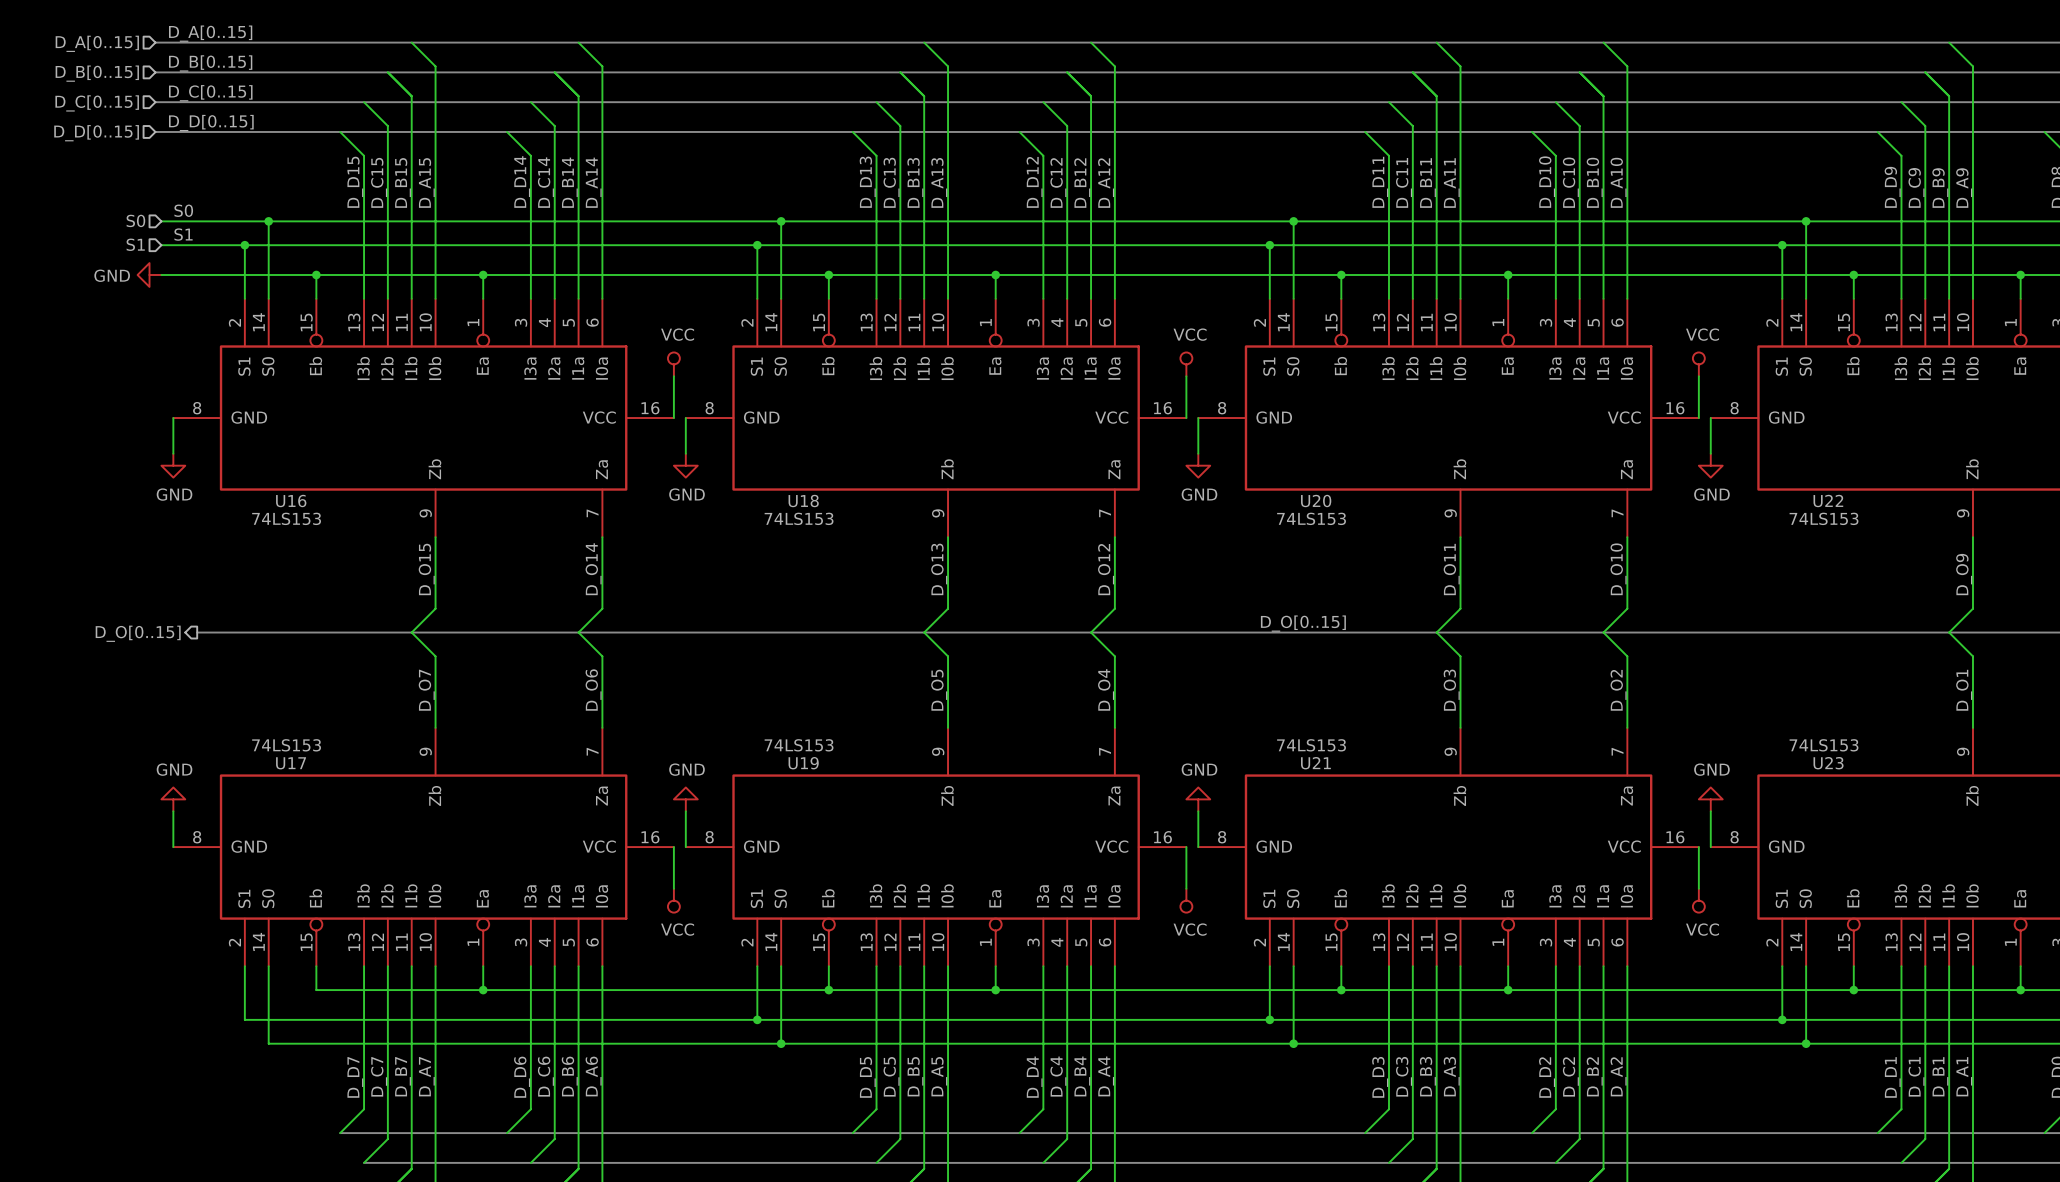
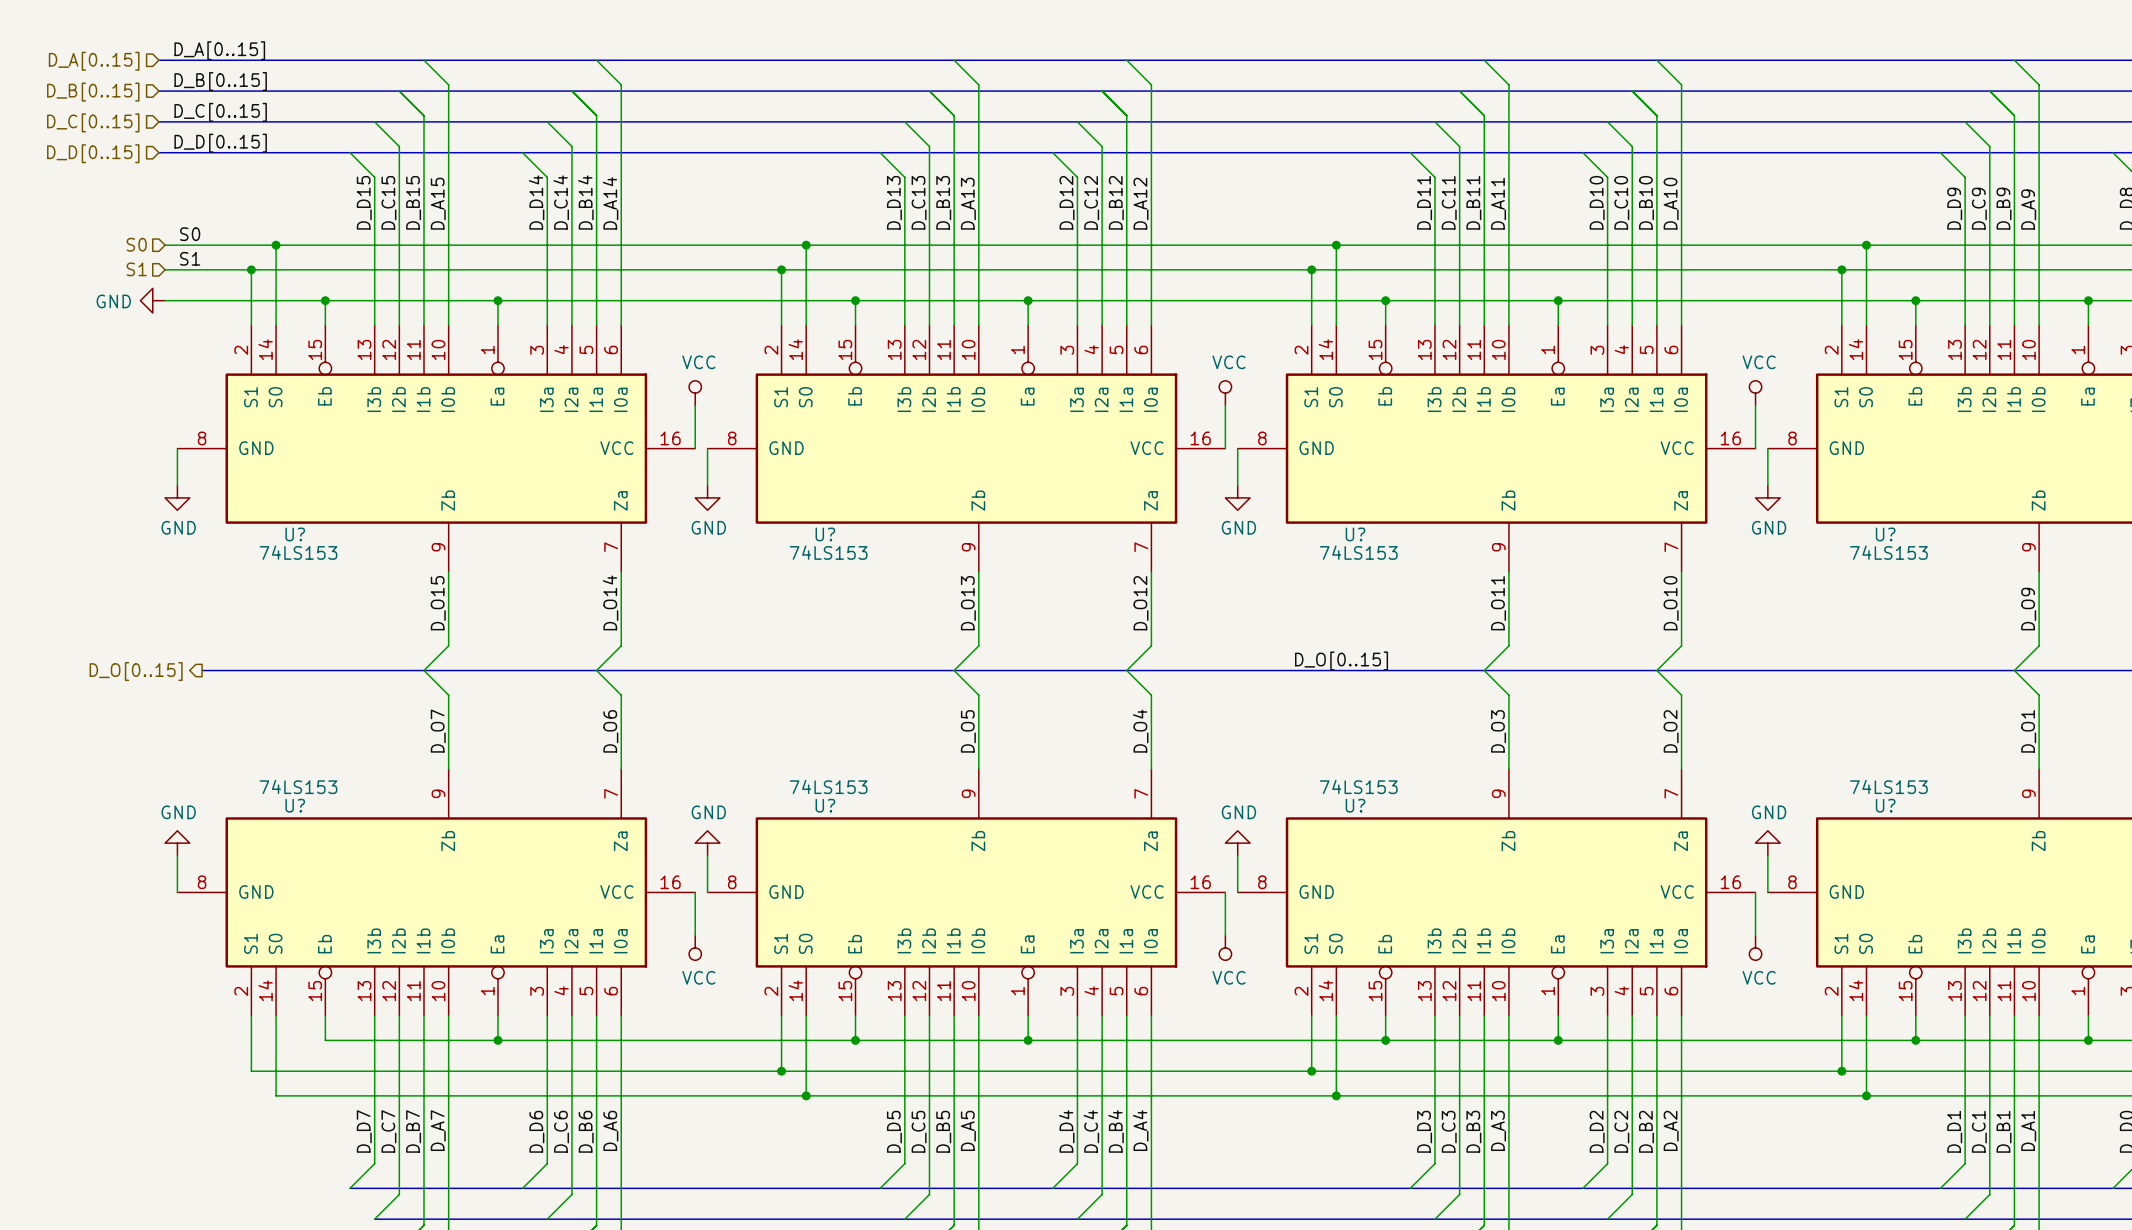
U16 name: U16 (291, 501) -> U? (295, 534)
U18 name: U18 (803, 501) -> U? (825, 534)
U20 name: U20 (1316, 501) -> U? (1355, 534)
U22 name: U22 (1828, 501) -> U? (1885, 534)
U17 name: U17 (291, 763) -> U? (295, 805)
U19 name: U19 (803, 763) -> U? (825, 805)
U21 name: U21 (1315, 763) -> U? (1355, 805)
U23 name: U23 (1828, 763) -> U? (1885, 805)

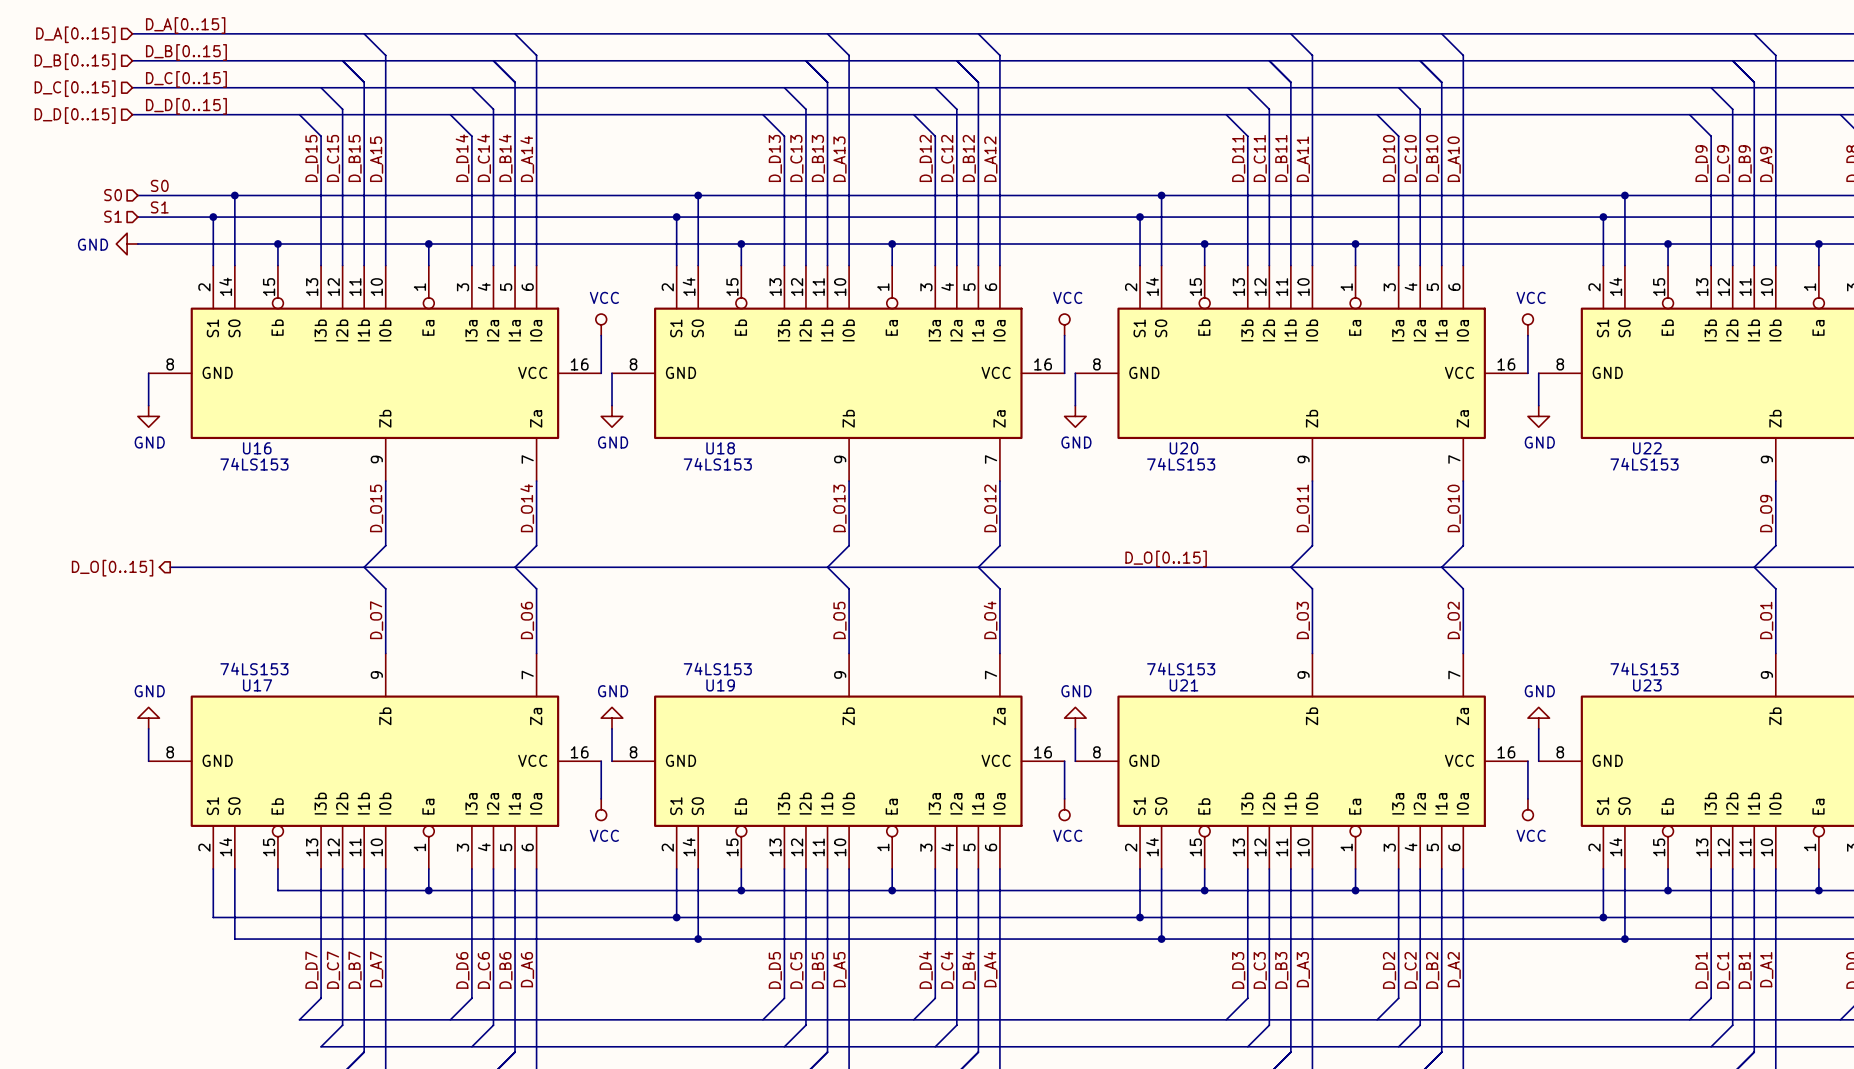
U? name: U? (295, 534) -> U16 (257, 448)
U? name: U? (825, 534) -> U18 (720, 448)
U? name: U? (1355, 534) -> U20 (1183, 448)
U? name: U? (1885, 534) -> U22 (1647, 448)
U? name: U? (295, 805) -> U17 (257, 685)
U? name: U? (825, 805) -> U19 (720, 685)
U? name: U? (1355, 805) -> U21 (1183, 685)
U? name: U? (1885, 805) -> U23 (1647, 685)

